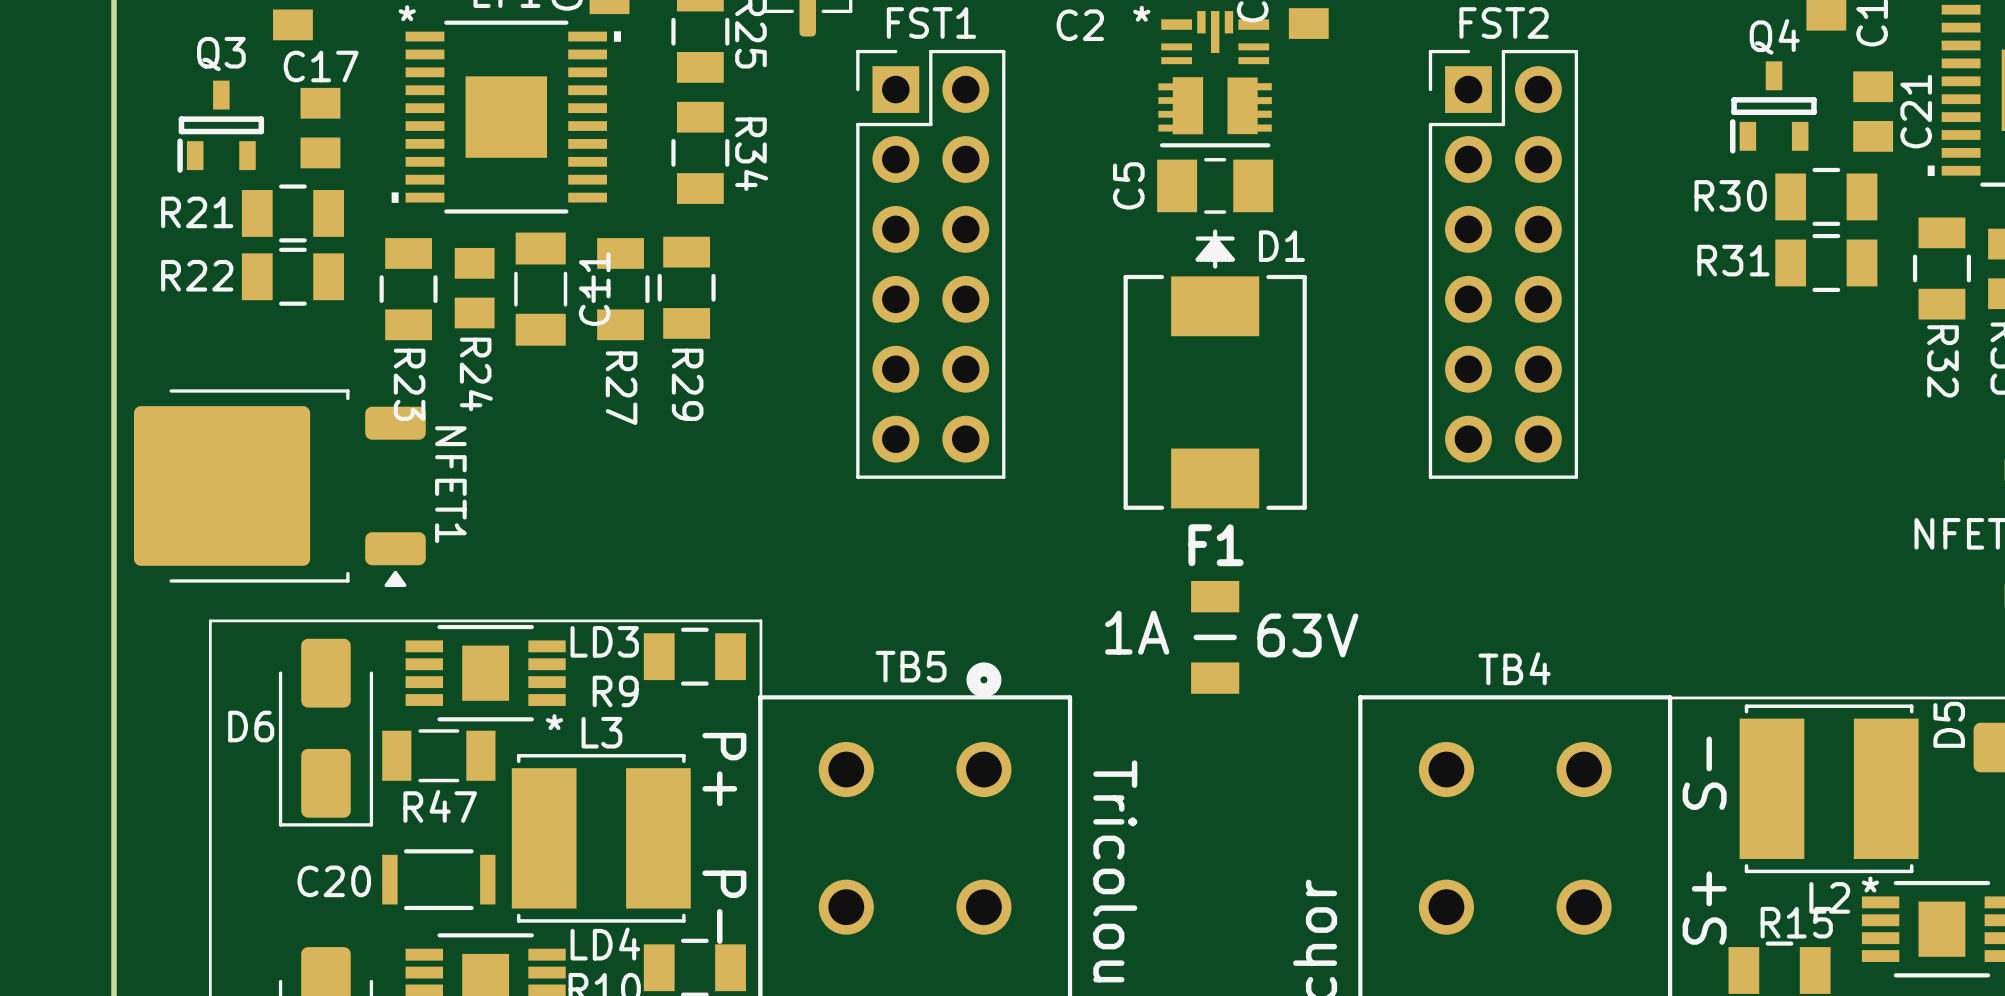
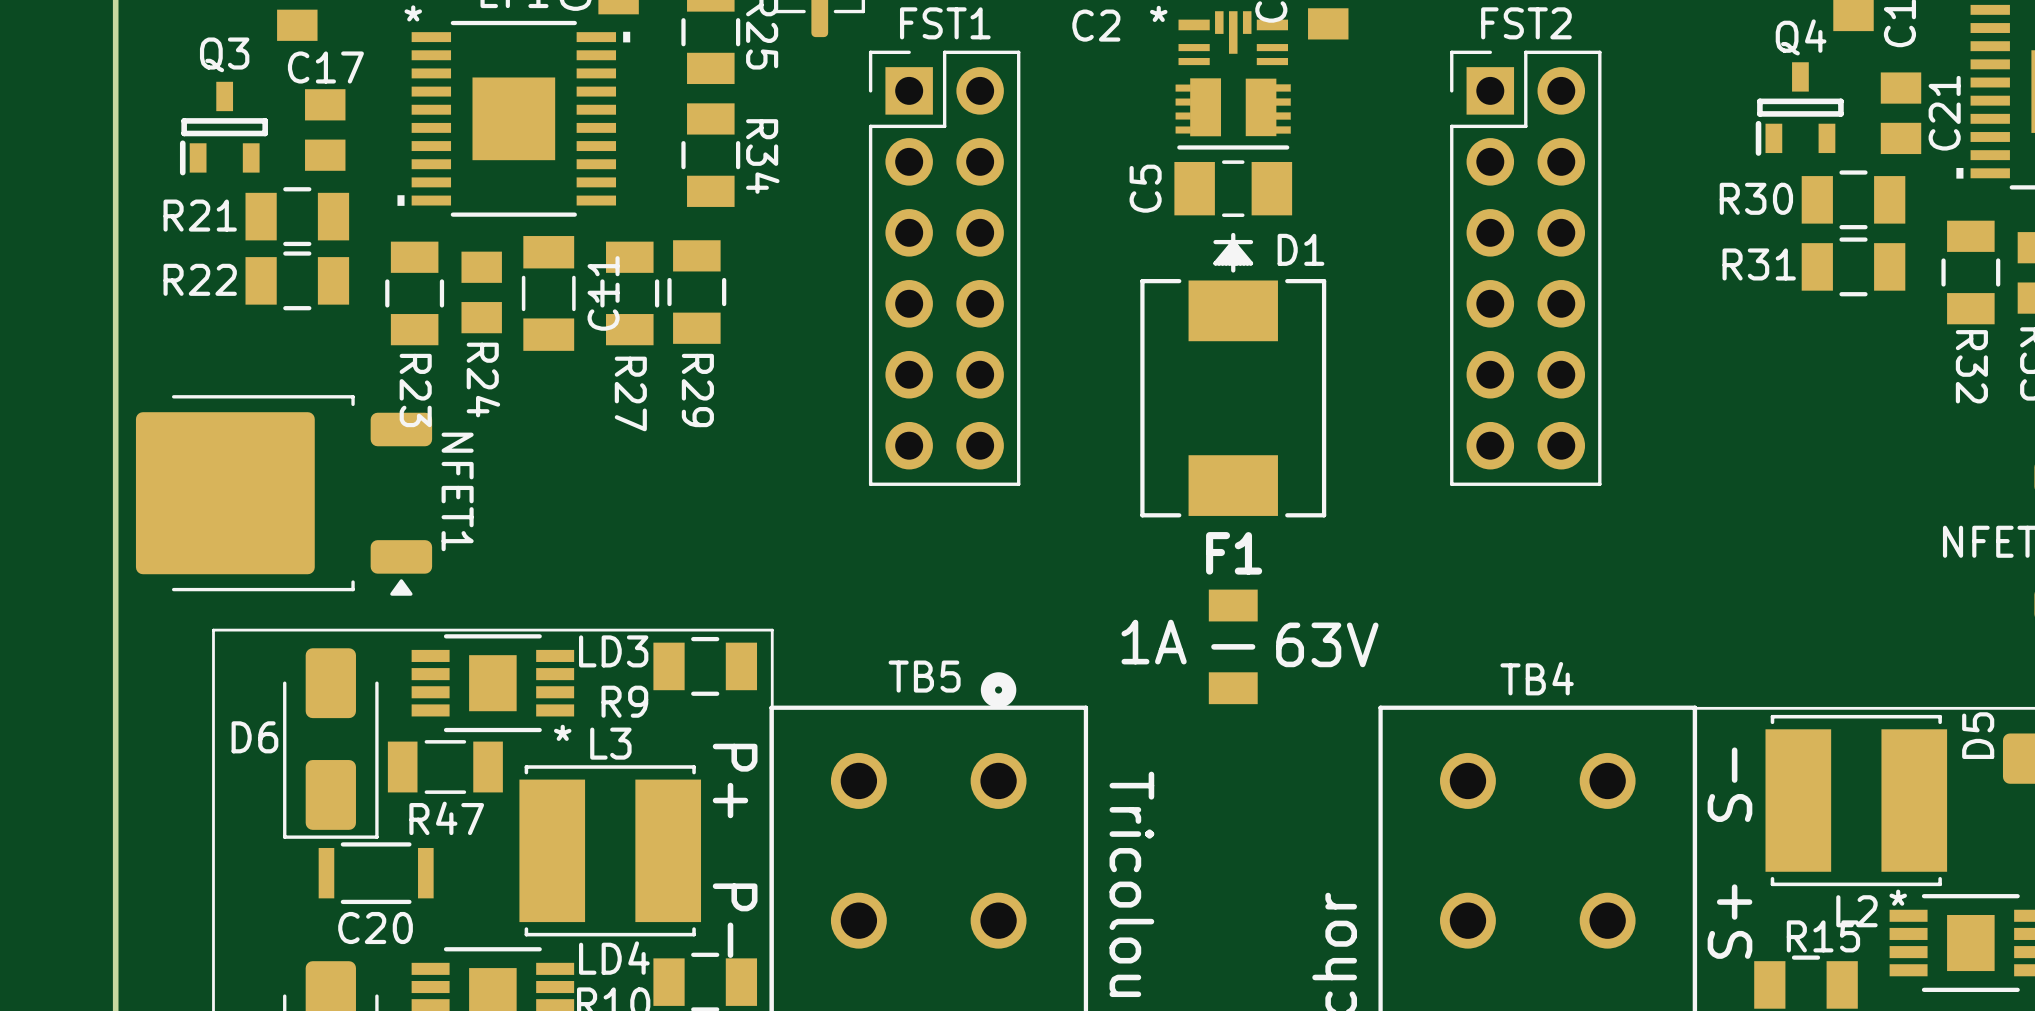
C20 position: (438, 879) -> (376, 873)
C20 name position: C20 (334, 881) -> C20 (375, 928)

